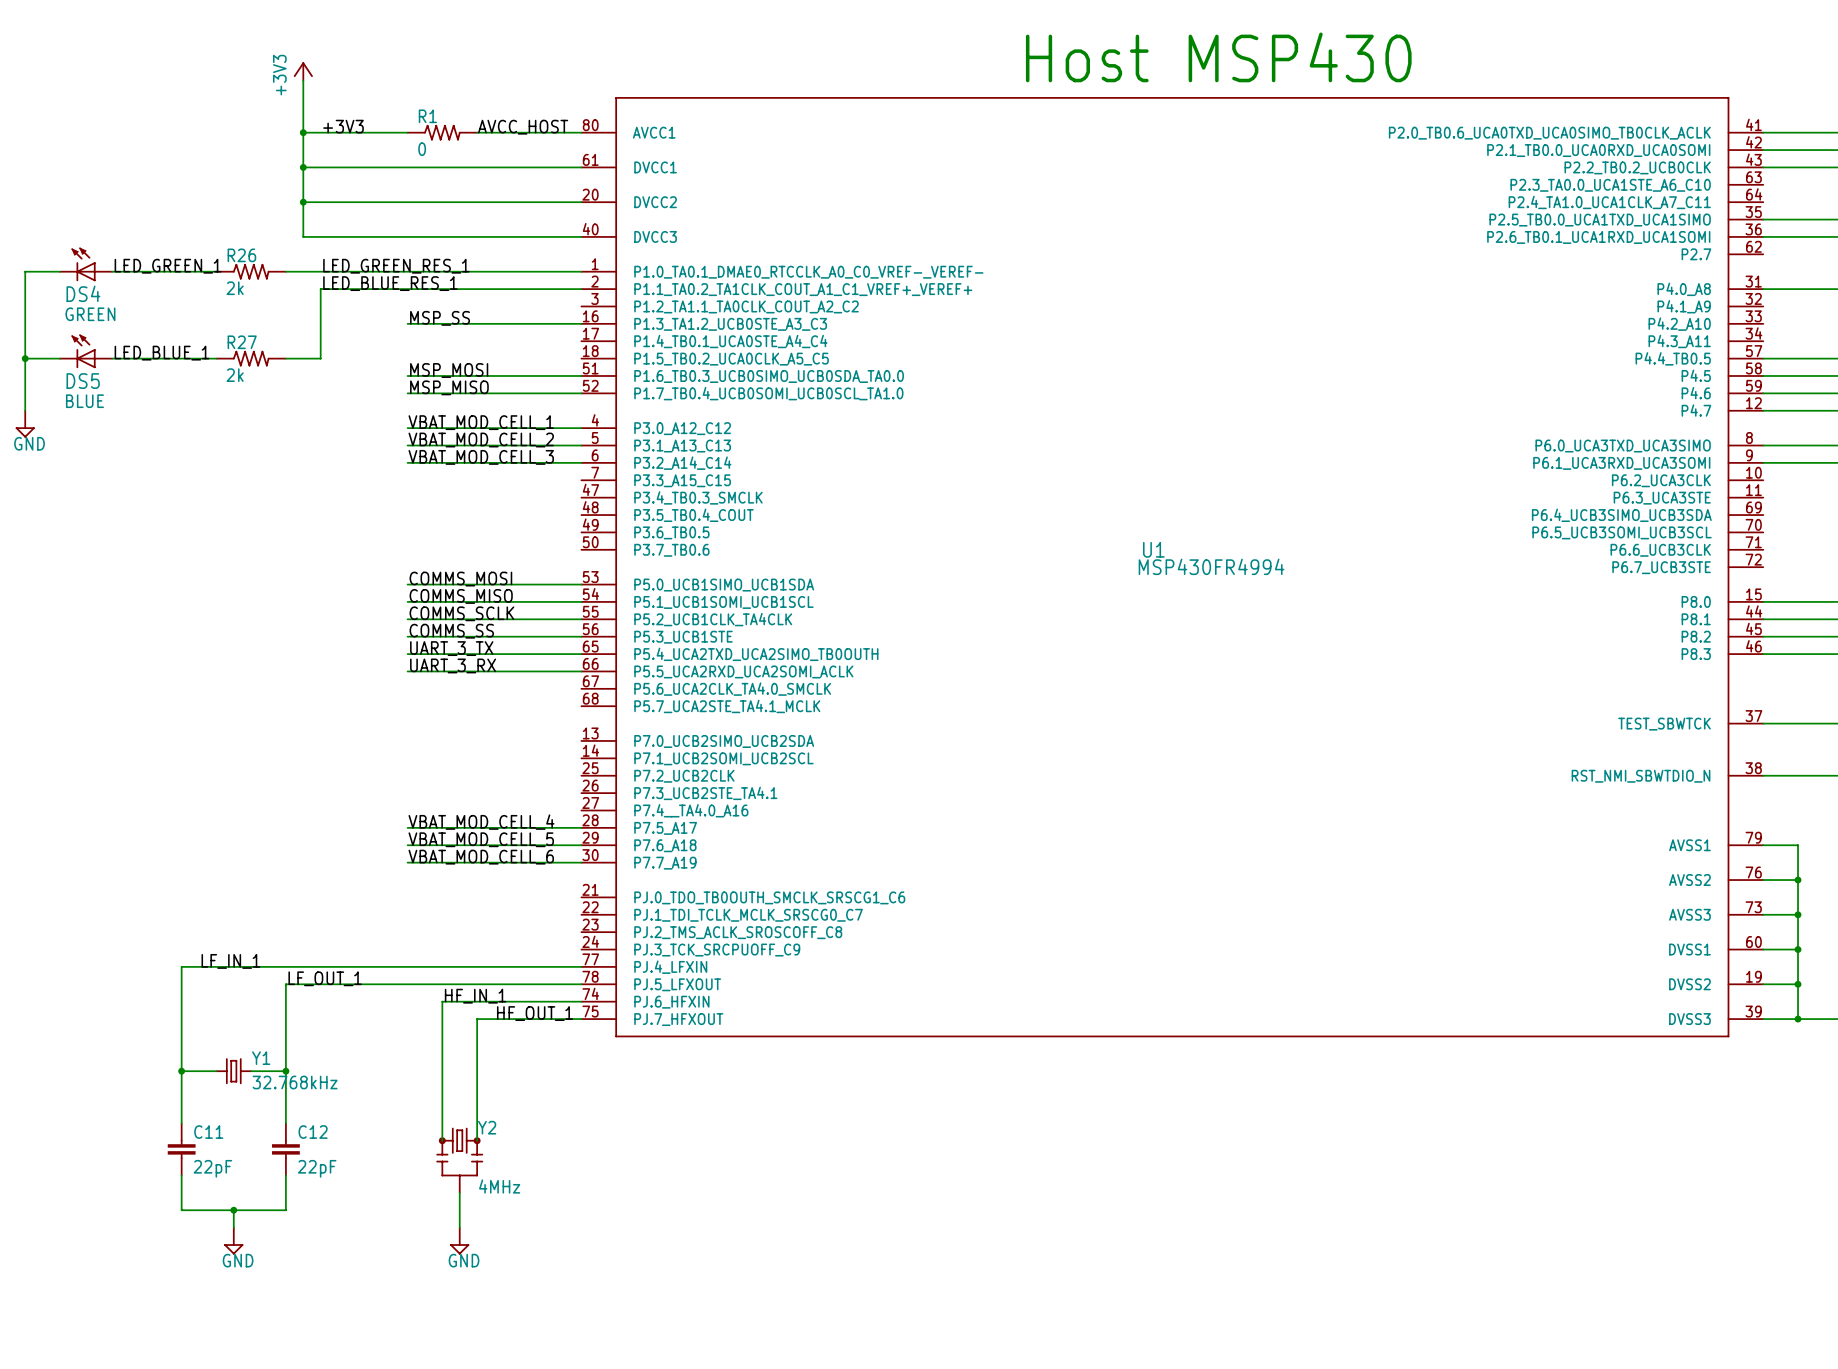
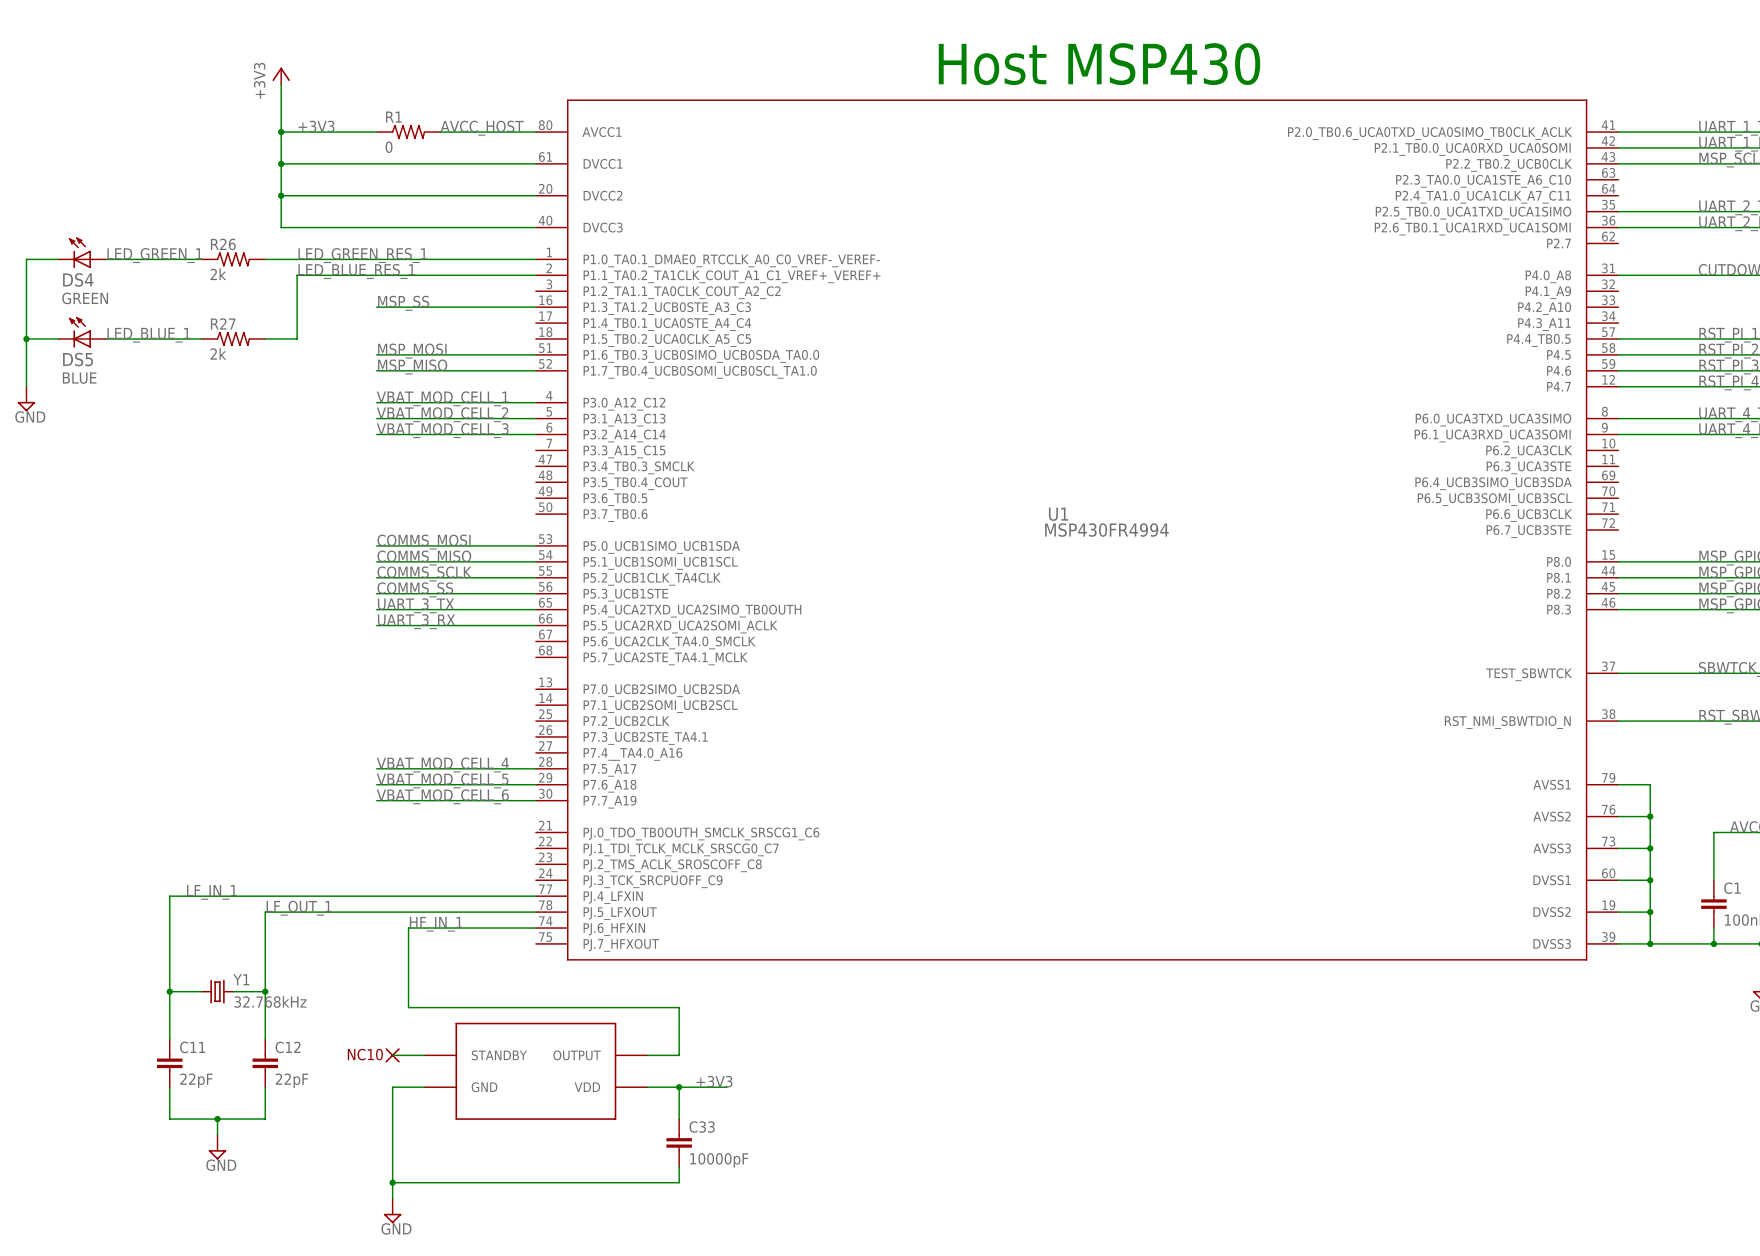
label: HF_OUT_1 (535, 1013) -> none
wire: (581, 1019) (477, 1019) (477, 1140) -> none
wire: (442, 1088) (442, 1140) -> (408, 1007) (679, 1007) (679, 1055) (647, 1055)
wire: none -> (392, 1055) (424, 1055)
NC10: none -> (392, 1055)
part: none -> (535, 1071)
Y2: 4MHz (459, 1160) -> none
label: none -> +3V3 (714, 1081)
wire: none -> (424, 1087) (392, 1087) (392, 1198)
wire: none -> (647, 1087) (726, 1087)
wire: none -> (679, 1087) (679, 1119)
junction: none -> (679, 1087)
wire: (459, 1192) (459, 1227) -> none
C33: none -> 10000pF (679, 1142)
power symbol position: GND (459, 1241) -> GND (392, 1210)
wire: none -> (679, 1166) (679, 1182) (392, 1182)
junction: none -> (392, 1182)

